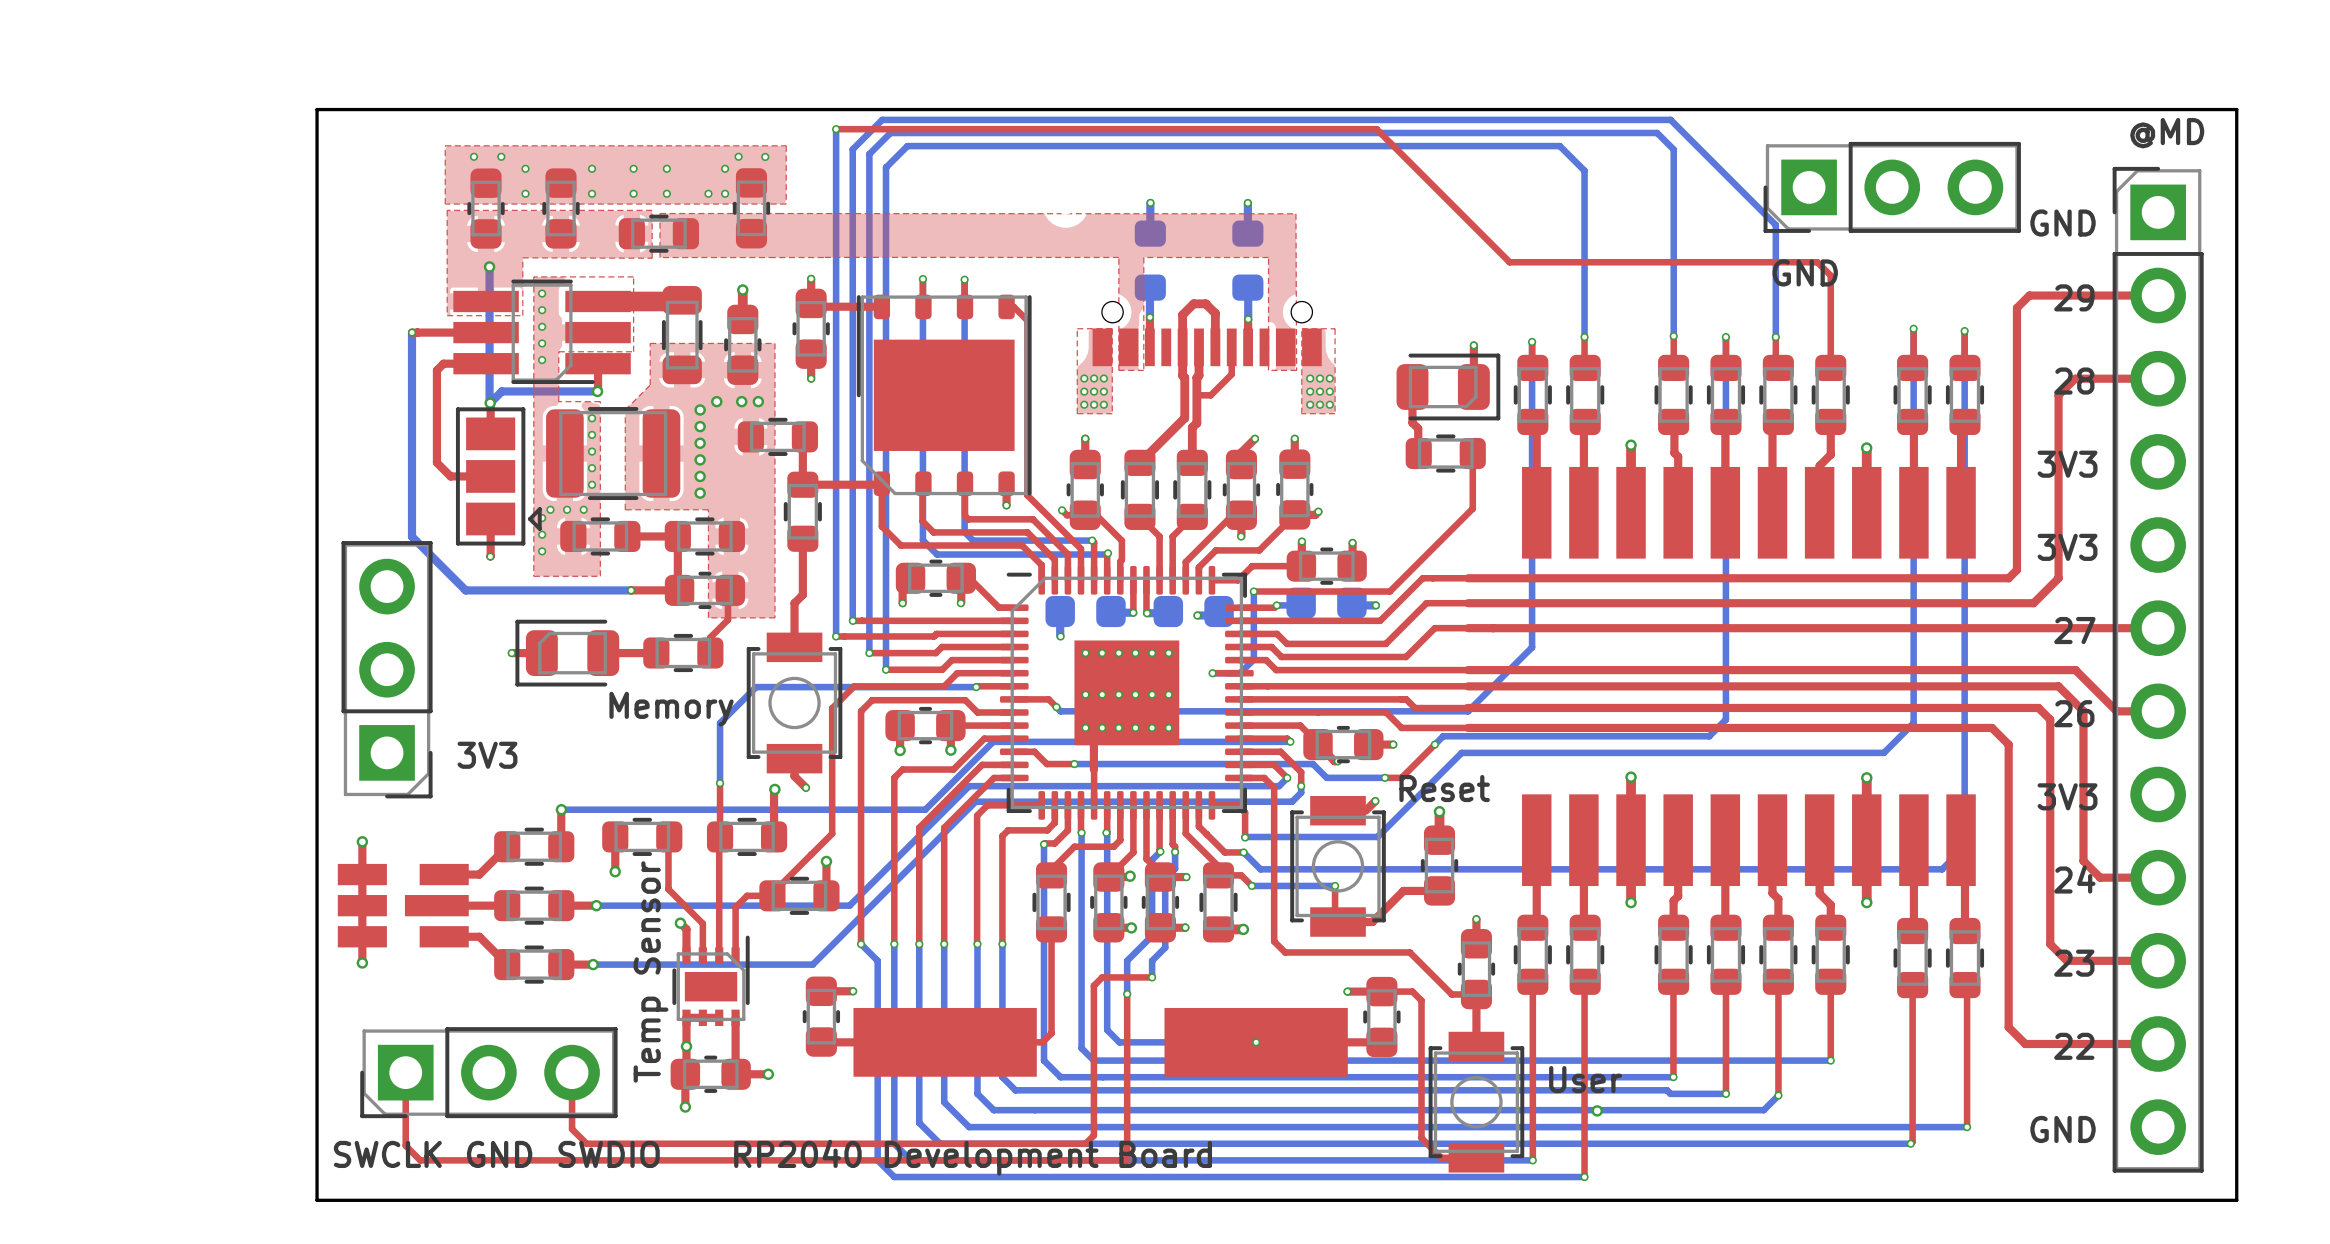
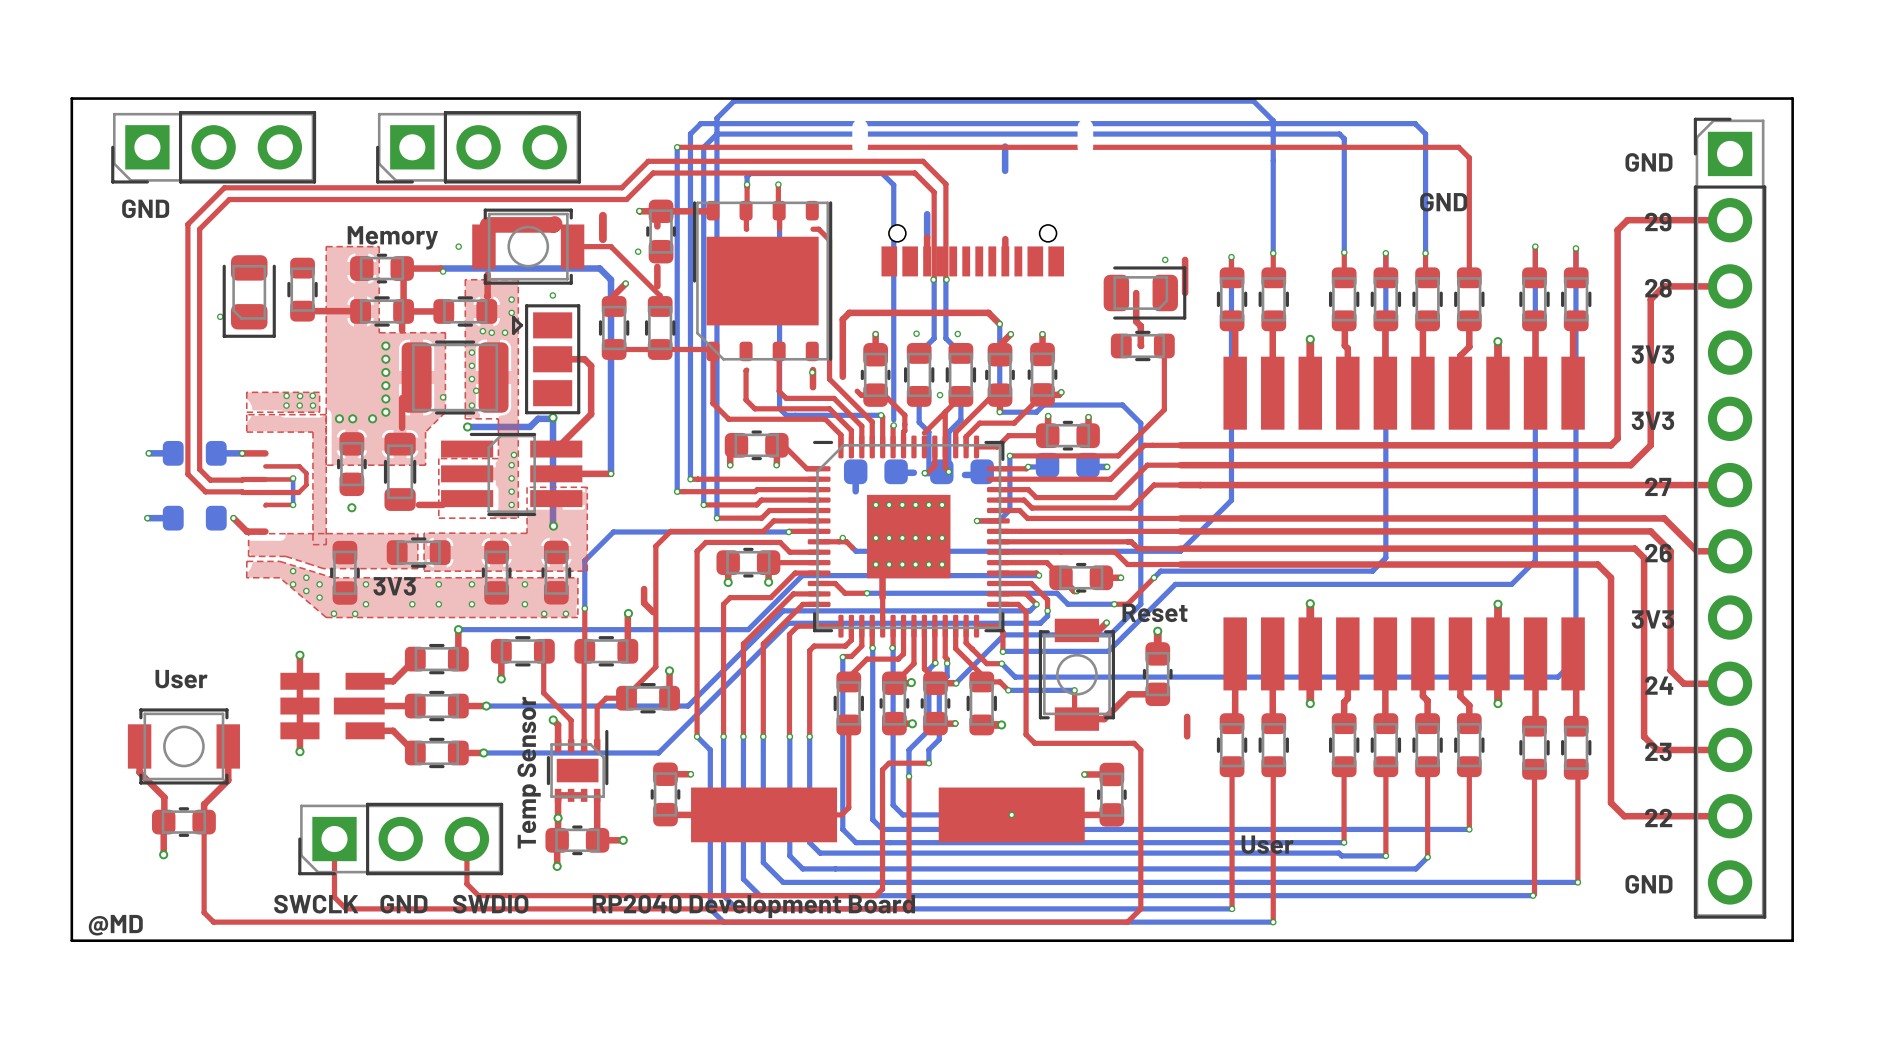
top track: (836, 129) (1376, 129) (1509, 262) (1817, 262) (1830, 275) -> (677, 147) (1458, 147) (1469, 157) (1469, 204)
bottom track: (836, 129) (836, 204) -> none
via: (836, 129) -> none
text: @MD (2167, 133) -> none
board edge: (2236, 142) (2236, 109) (317, 109) (317, 1200) -> (1792, 98) (71, 98) (71, 940) (263, 940)
top zone outline: (445, 145) (786, 145) (786, 204) (445, 204) (445, 145) -> none
via: (473, 156) -> none
via: (501, 156) -> none
via: (738, 156) -> none
via: (765, 156) -> none
via: (525, 168) -> none
part footprint: [542, 168, 580, 249] -> [376, 111, 582, 184]
via: (592, 168) -> none
via: (633, 168) -> none
via: (666, 168) -> none
via: (725, 168) -> none
bottom track: (852, 187) (852, 149) (882, 119) (1670, 119) (1775, 225) -> (690, 134) (700, 123) (1415, 123) (1425, 134) (1425, 164)
part: (1892, 187) -> none
via: (525, 193) -> none
via: (592, 193) -> none
via: (633, 193) -> none
via: (666, 193) -> none
via: (708, 193) -> none
via: (725, 193) -> none
bottom track: (1673, 193) (1673, 149) (1657, 132) (890, 132) (869, 154) (869, 204) -> (1344, 138) (1339, 134) (716, 134) (703, 147)
via: (1150, 202) -> none
bottom track: (1150, 203) (1150, 233) -> none
via: (1247, 203) -> none
via: none -> (677, 147)
part: (486, 208) -> none
part: (751, 208) -> none
top zone outline: (447, 210) (652, 210) (652, 258) (522, 257) (522, 315) (447, 315) (447, 210) -> none
part: (658, 233) -> none
top track: none -> (747, 184) (746, 210)
bottom track: none -> (747, 184) (747, 176) (750, 173) (882, 173) (893, 185) (893, 420)
via: none -> (747, 184)
via: none -> (778, 184)
top zone outline: (823, 257) (660, 257) (660, 213) (1295, 213) (1296, 370) (1268, 370) (1268, 257) (1143, 257) (1143, 370) (1118, 370) (1118, 257) (823, 257) -> none
part: (1150, 260) -> none
part: (1247, 260) -> none
bottom track: (489, 266) (489, 402) (501, 391) (597, 391) -> none
via: (489, 266) -> none
top zone outline: (533, 276) (633, 276) (633, 351) (558, 351) (558, 401) (600, 401) (600, 576) (533, 576) (533, 276) -> (465, 279) (465, 418) (498, 418) (498, 458) (438, 458) (438, 518) (518, 518) (518, 279) (465, 279)
via position: (811, 278) -> (639, 211)
bottom track: (922, 279) (922, 540) (937, 554) (1108, 553) -> none
via: (922, 279) -> none
via: (964, 279) -> none
text: none -> GND (145, 208)
top track: none -> (712, 210) (639, 211)
bottom track: (1248, 287) (1248, 319) -> none
via: (742, 289) -> none
via: (542, 293) -> none
top track: (806, 306) (881, 306) -> none
via: (542, 310) -> none
via: (1149, 317) -> none
via: (1248, 319) -> none
via: (542, 326) -> none
top zone outline: none -> (326, 246) (326, 465) (425, 465) (425, 432) (445, 412) (445, 332) (379, 332) (379, 246) (326, 246)
via: none -> (458, 246)
part: none -> (528, 246)
top track: none -> (572, 246) (610, 246) (660, 295) (660, 306)
part position: (811, 328) -> (661, 231)
top zone outline: (1077, 328) (1112, 328) (1112, 413) (1077, 413) (1077, 328) -> none
top zone outline: (1301, 328) (1335, 328) (1335, 413) (1301, 413) (1301, 328) -> none
part rotation: 0° (542, 331) -> 180° (511, 474)
part position: (542, 331) -> (511, 474)
bottom track: (411, 332) (411, 536) (465, 590) (631, 590) -> none
via: (411, 332) -> none
part position: (682, 335) -> (400, 471)
via: none -> (638, 251)
via: (542, 343) -> none
top zone outline: (650, 343) (650, 385) (625, 409) (625, 509) (708, 509) (708, 617) (774, 617) (774, 343) (650, 343) -> none
part: (742, 344) -> none
via position: (1473, 345) -> (1165, 259)
top track: (1199, 347) (1196, 423) (1192, 427) (1192, 462) -> none
top track: (1215, 347) (1215, 313) (1205, 303) (1193, 303) (1182, 314) (1184, 418) (1139, 462) -> none
top track: (1231, 347) (1231, 374) (1210, 395) (1199, 395) -> none
part: none -> (381, 268)
top track: none -> (440, 268) (402, 268) (403, 311) (443, 311)
bottom track: none -> (440, 268) (599, 268) (610, 279) (610, 473)
top track: (486, 363) (443, 363) (436, 370) (436, 462) (450, 476) (490, 476) -> none
top track: none -> (933, 279) (934, 192) (914, 173) (653, 173) (626, 199) (229, 199) (199, 229) (199, 469) (210, 480) (293, 478)
bottom track: none -> (933, 279) (934, 338) (919, 353)
via: none -> (933, 279)
top track: none -> (946, 279) (945, 184) (923, 161) (648, 161) (621, 187) (224, 187) (187, 224) (187, 474) (205, 491) (298, 492) (306, 485) (306, 473) (299, 466) (265, 466)
bottom track: none -> (946, 279) (945, 338) (960, 353)
via: none -> (946, 279)
top track: none -> (625, 283) (614, 295) (614, 306)
via: none -> (625, 283)
via: (811, 378) -> none
via: (1084, 378) -> none
via: (1094, 378) -> none
via: (1103, 378) -> none
via: (1310, 378) -> none
via: (1320, 378) -> none
via: (1329, 378) -> none
part: none -> (302, 289)
part position: (1448, 386) -> (1144, 293)
via: none -> (552, 295)
via: (597, 391) -> none
via: (1084, 391) -> none
via: (1094, 391) -> none
via: (1103, 391) -> none
via: (1310, 391) -> none
via: (1320, 391) -> none
via: (1329, 391) -> none
via: none -> (511, 299)
part position: (944, 395) -> (762, 281)
via: (716, 401) -> none
via: (741, 401) -> none
via: (758, 401) -> none
via: (490, 403) -> none
via: (1084, 404) -> none
via: (1094, 404) -> none
via: (1103, 404) -> none
via: (1310, 404) -> none
via: (1320, 404) -> none
via: (1329, 404) -> none
top track: none -> (302, 311) (360, 311)
via: (700, 409) -> none
part: none -> (382, 311)
part: none -> (465, 311)
via: none -> (511, 312)
via: none -> (220, 316)
via: (592, 418) -> none
via: (700, 426) -> none
top track: none -> (999, 324) (988, 312) (849, 312) (842, 319) (842, 376)
bottom track: none -> (999, 324) (999, 412) (1036, 412) (1043, 405) (1122, 405) (1140, 423) (1140, 604) (1110, 634) (1004, 634) (956, 682)
via: none -> (999, 324)
part: none -> (614, 327)
part: none -> (660, 327)
via: none -> (491, 332)
via: none -> (505, 332)
part: (777, 436) -> none
top track: (804, 436) (802, 438) (802, 484) (881, 483) (881, 526) -> (614, 349) (710, 349) (712, 351) (713, 404)
via: none -> (916, 333)
via: none -> (957, 333)
via: (700, 443) -> none
via: (592, 451) -> none
via: none -> (385, 345)
part position: (613, 453) -> (455, 377)
part position: (1445, 453) -> (1142, 345)
top track: (1472, 453) (1472, 508) (1447, 533) -> (1164, 345) (1164, 409)
via: (700, 459) -> none
via: none -> (471, 352)
via: (592, 468) -> none
via: none -> (385, 359)
top track: none -> (552, 359) (584, 359) (591, 365) (591, 414) (556, 449)
part rotation: 0° (498, 476) -> 180° (546, 359)
part position: (498, 476) -> (546, 359)
via: (700, 476) -> none
via: none -> (471, 365)
top track: (965, 483) (965, 515) (968, 519) (972, 519) -> (779, 351) (779, 391) (786, 398)
via: (592, 484) -> none
via: none -> (385, 372)
via: (700, 493) -> none
via: none -> (471, 379)
via: none -> (385, 385)
via position: (1006, 505) -> (812, 372)
via: (550, 509) -> none
via: (567, 509) -> none
via: (1062, 510) -> none
top zone outline: none -> (246, 392) (246, 412) (319, 412) (319, 392) (246, 392)
part: (802, 511) -> none
via: none -> (940, 395)
via: none -> (286, 395)
via: none -> (300, 396)
via: none -> (312, 395)
top track: (1139, 516) (1159, 536) (1159, 580) -> (928, 471) (934, 465) (934, 446)
bottom track: none -> (919, 396) (919, 422) (928, 432) (928, 471)
bottom track: none -> (960, 396) (960, 419) (948, 432) (948, 471)
via: none -> (385, 398)
via: none -> (286, 405)
via: none -> (299, 405)
via: none -> (312, 405)
via: none -> (471, 405)
via: (542, 534) -> none
via: none -> (385, 412)
part: (600, 536) -> none
top track: (627, 536) (677, 536) (677, 588) (679, 590) (631, 590) -> none
part: (704, 536) -> none
top zone outline: none -> (246, 414) (246, 432) (312, 432) (312, 544) (326, 544) (326, 414) (246, 414)
top track: (800, 541) (802, 538) (802, 594) (794, 603) (794, 647) -> none
via: none -> (553, 417)
via: none -> (339, 418)
via: none -> (352, 418)
via: none -> (372, 418)
via: (542, 551) -> none
bottom track: none -> (467, 426) (530, 426) (538, 418) (553, 417) (553, 526)
via: none -> (467, 426)
via: (490, 556) -> none
top track: (1133, 580) (1133, 612) -> none
top track: (1146, 580) (1147, 613) -> (778, 184) (779, 210)
top track: none -> (945, 446) (945, 468) (948, 471)
bottom track: none -> (148, 453) (173, 453)
via: none -> (148, 453)
part: none -> (194, 453)
bottom track: none -> (216, 453) (242, 453)
top track: none -> (242, 453) (265, 453)
via: none -> (242, 453)
part: (704, 590) -> none
top track: (730, 590) (728, 592) (728, 619) (710, 637) (710, 653) -> none
part: none -> (351, 464)
via: none -> (511, 465)
via: (1133, 612) -> none
top track: none -> (556, 473) (610, 473)
via: none -> (610, 473)
via position: (1197, 615) -> (948, 471)
bottom track: none -> (293, 478) (293, 504)
via: none -> (293, 478)
via: none -> (511, 478)
top zone outline: none -> (527, 487) (587, 487) (587, 571) (424, 571) (424, 533) (527, 533) (527, 487)
via: none -> (511, 491)
via: (1060, 636) -> none
top track: none -> (293, 504) (265, 505)
via: none -> (293, 504)
via: (511, 653) -> none
part rotation: 0° (567, 653) -> 90° counterclockwise (249, 296)
part position: (567, 653) -> (249, 296)
top track: (603, 653) (656, 653) -> none
via: none -> (511, 504)
part: (683, 653) -> none
via: none -> (351, 507)
bottom track: none -> (147, 518) (173, 518)
via: none -> (147, 518)
part: none -> (194, 518)
top track: none -> (233, 518) (246, 531) (265, 531)
via: none -> (233, 518)
part rotation: 0° (387, 669) -> 90° clockwise (213, 147)
part position: (387, 669) -> (213, 147)
via: none -> (553, 526)
top track: (854, 686) (832, 708) (832, 833) (809, 856) -> (691, 531) (670, 531) (655, 546) (655, 666)
top zone outline: none -> (248, 533) (417, 533) (417, 568) (323, 568) (285, 556) (248, 556) (248, 533)
part: (794, 703) -> none
via position: (1056, 707) -> (842, 538)
text position: Memory (671, 709) -> Memory (392, 237)
part: none -> (418, 552)
top zone outline: none -> (246, 561) (279, 561) (332, 577) (577, 577) (577, 617) (326, 617) (279, 577) (246, 577) (246, 561)
via: none -> (293, 571)
part: none -> (344, 572)
part: none -> (496, 572)
part: none -> (556, 572)
via: none -> (306, 577)
via: none -> (293, 584)
via: none -> (319, 584)
via: none -> (365, 584)
via: none -> (438, 584)
via: none -> (471, 584)
via: none -> (524, 584)
via: none -> (306, 591)
via: none -> (319, 597)
via: none -> (365, 604)
via: none -> (412, 604)
via: none -> (438, 604)
via: none -> (471, 604)
via: none -> (524, 604)
via: (805, 787) -> none
via: none -> (333, 613)
via: none -> (355, 613)
via: none -> (544, 613)
via: none -> (565, 613)
text: none -> User (181, 679)
via: (1476, 919) -> none
top track: none -> (139, 746) (139, 772) (164, 797) (163, 854)
part: none -> (183, 746)
top track: (1418, 960) (1451, 994) (1476, 994) (1476, 1046) -> (1140, 749) (1140, 908) (1127, 922) (213, 922) (204, 912) (204, 804) (228, 780) (228, 746)
part: (1476, 969) -> none
top track: (1381, 991) (1412, 991) (1421, 1000) (1421, 1138) (1441, 1157) (1476, 1157) -> none
part: none -> (183, 822)
via: none -> (163, 854)
part: (1476, 1102) -> none
via: (1597, 1110) -> none
text: none -> @MD (115, 925)

